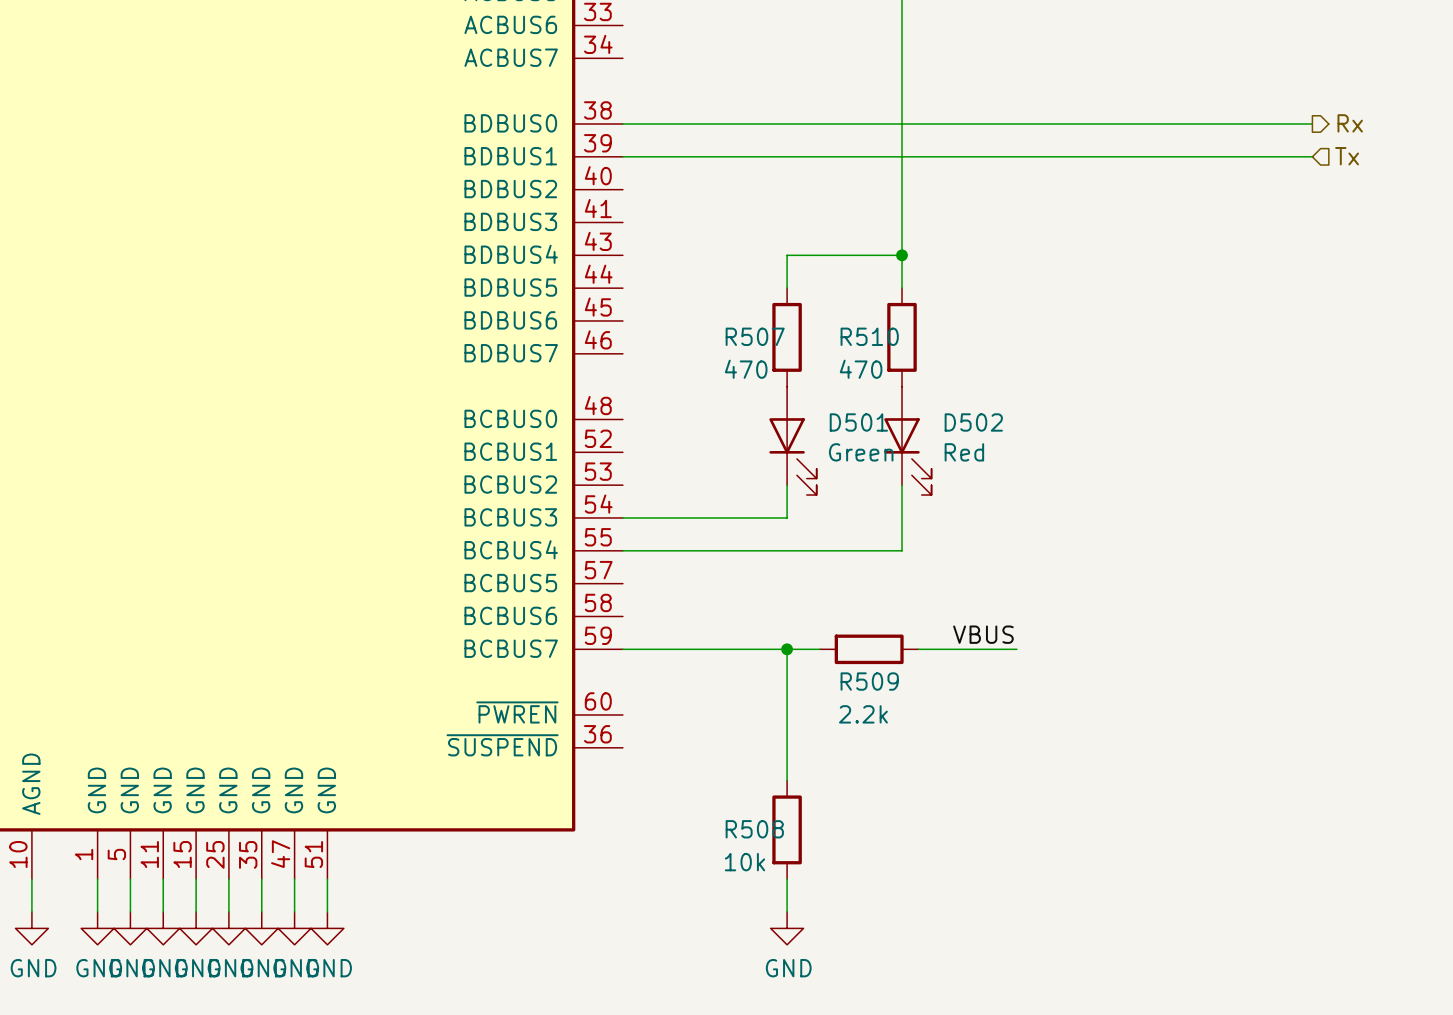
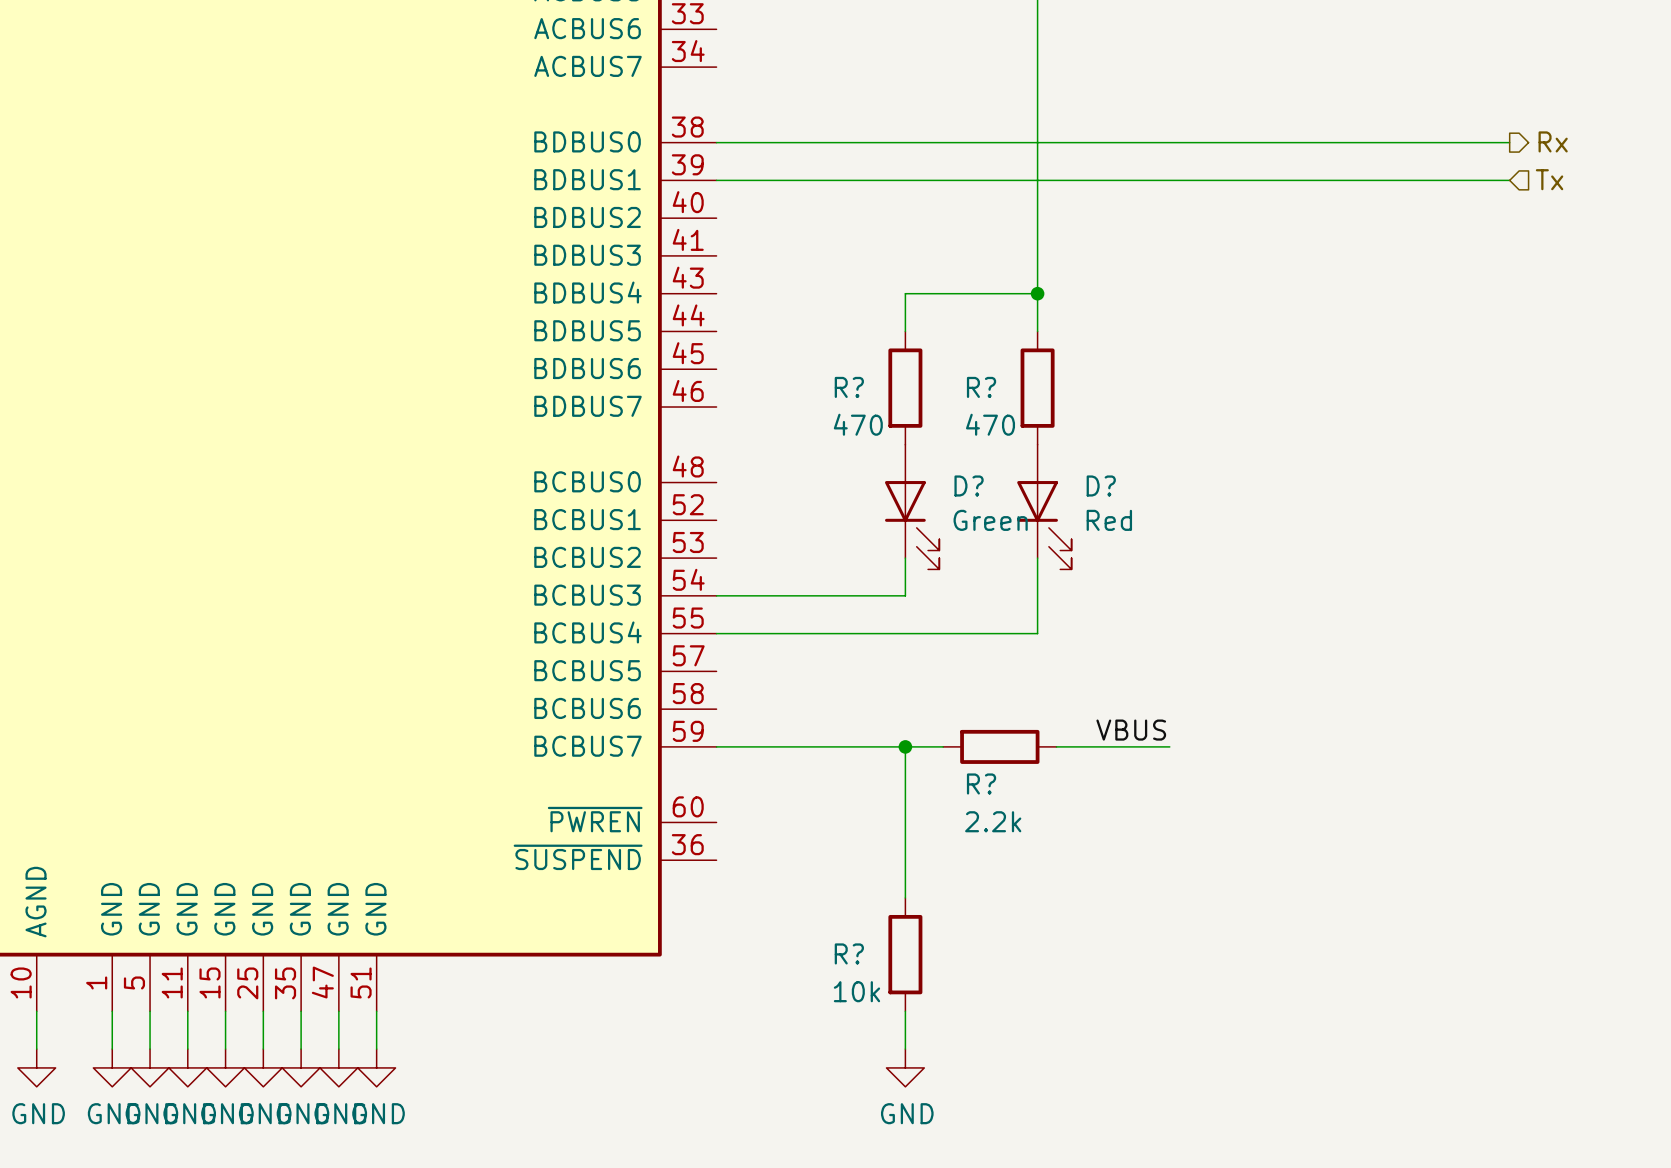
R507 name: R507 (755, 336) -> R? (849, 387)
R510 name: R510 (869, 336) -> R? (981, 387)
D501 name: D501 (858, 422) -> D? (969, 485)
D502 name: D502 (973, 422) -> D? (1101, 485)
R509 name: R509 (869, 681) -> R? (981, 783)
R508 name: R508 (754, 829) -> R? (849, 953)

